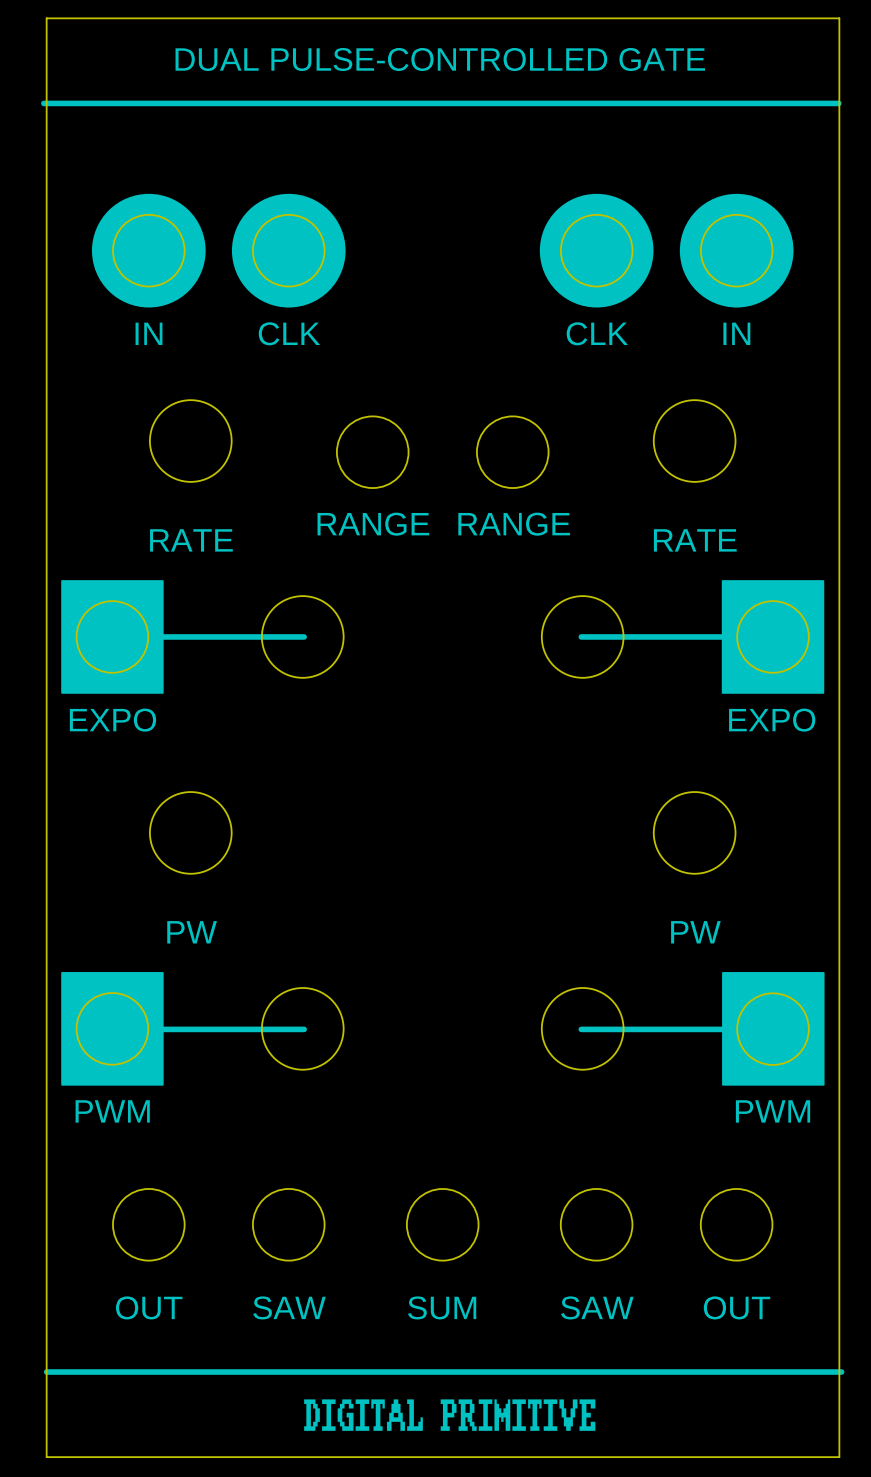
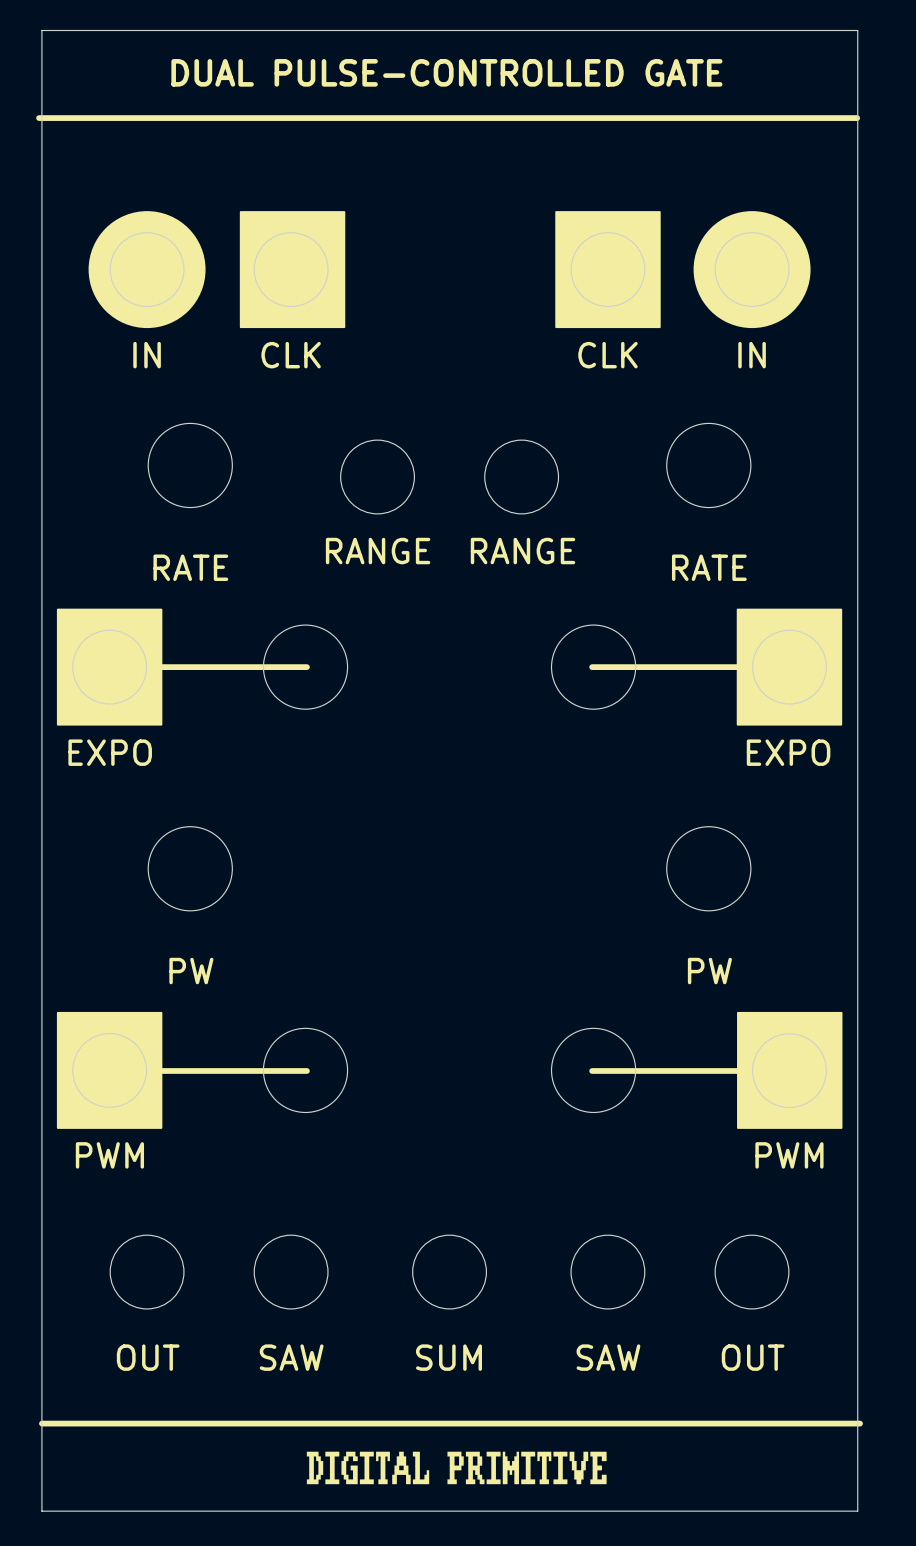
drawing shape: [231, 193, 346, 308] -> [239, 211, 346, 329]
drawing shape: [539, 193, 654, 308] -> [555, 211, 661, 329]

